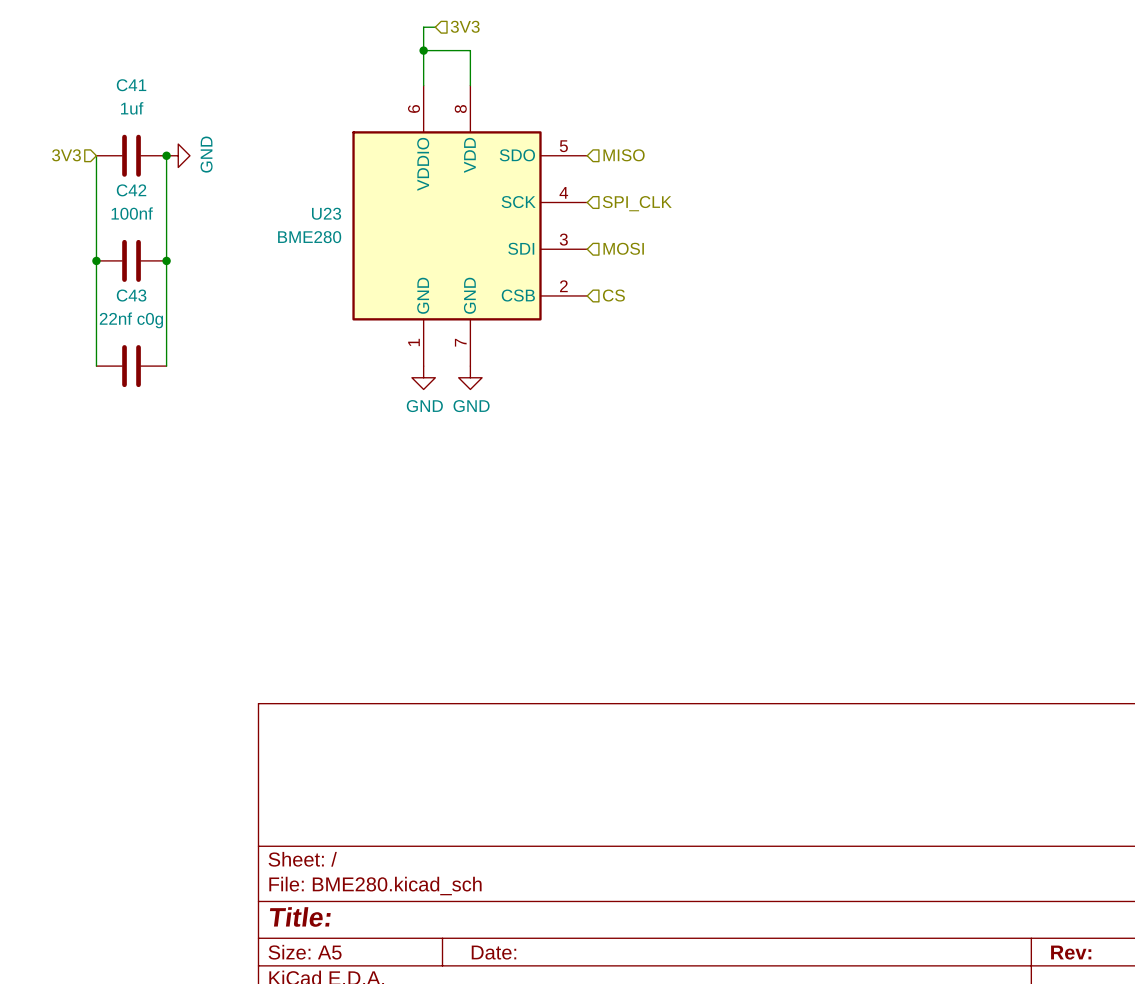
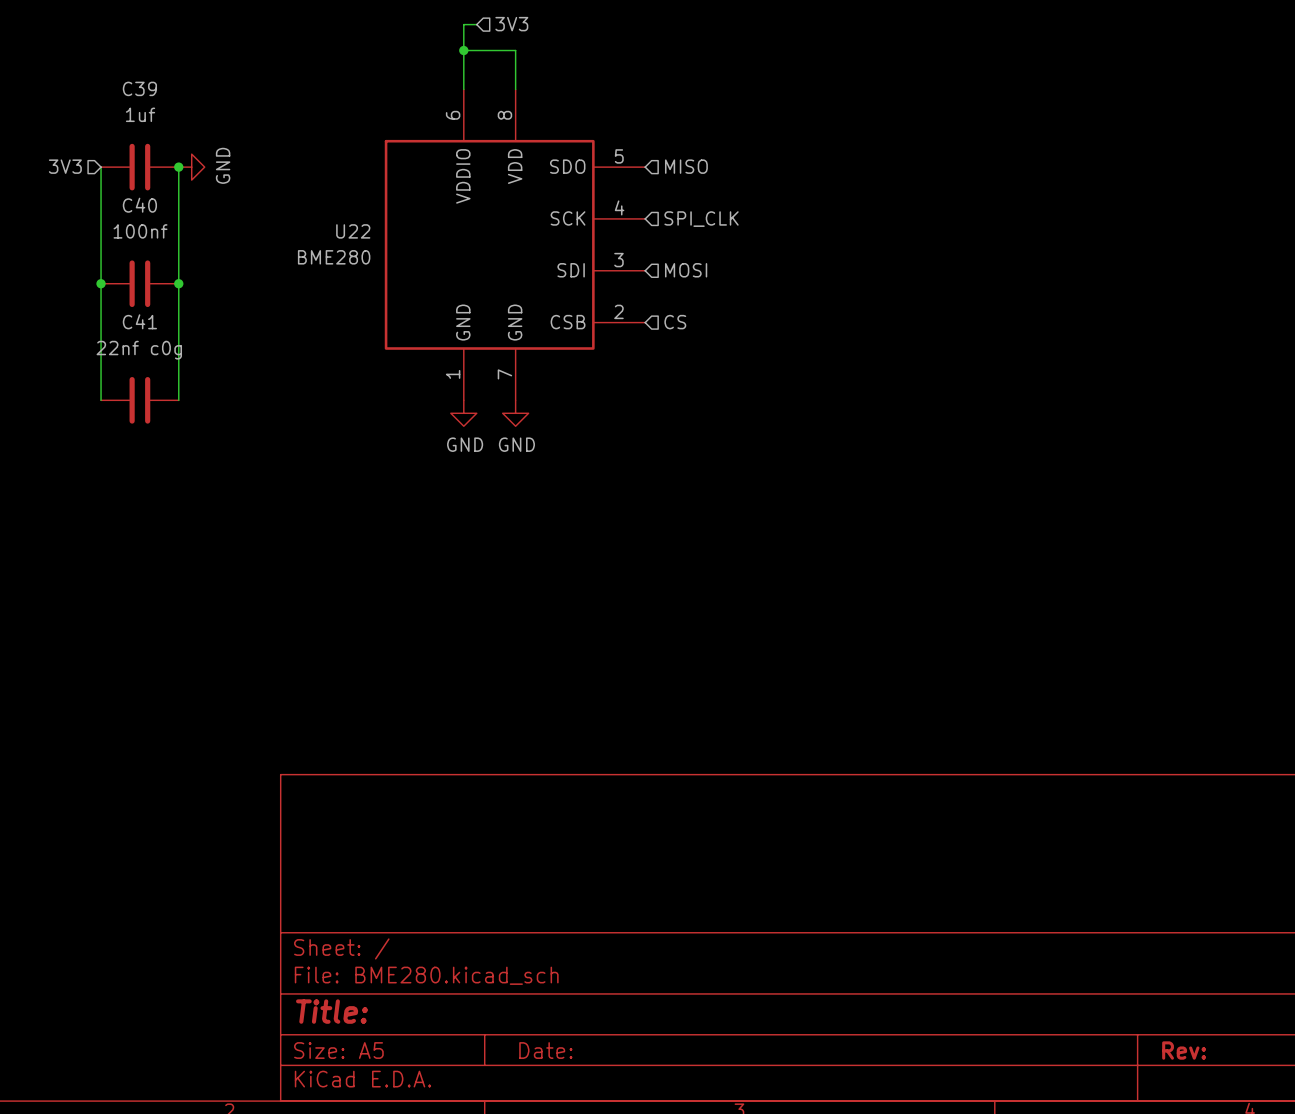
C41 name: C41 (131, 85) -> C39 (139, 88)
C42 name: C42 (131, 190) -> C40 (139, 205)
U23 name: U23 (326, 213) -> U22 (353, 231)
C43 name: C43 (131, 295) -> C41 (139, 321)

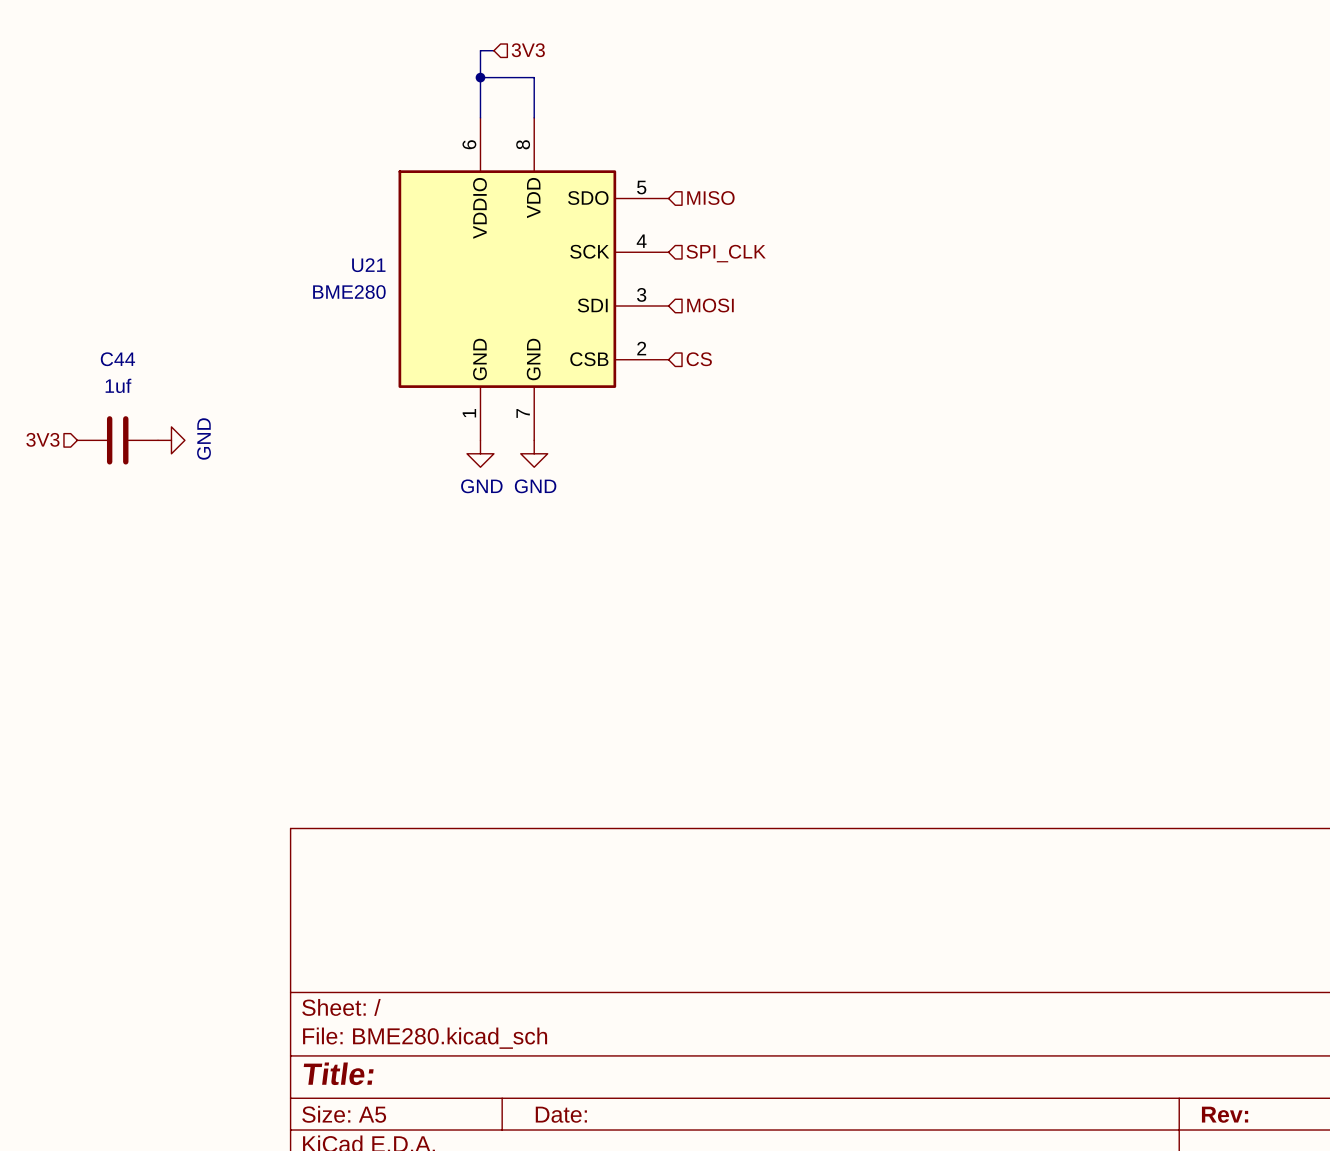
hierarchical label position: 3V3 (65, 166) -> 3V3 (42, 439)
wire: (101, 167) (101, 400) -> none
C39: 1uf (139, 167) -> none
wire: (178, 167) (178, 400) -> none
junction: (178, 167) -> none
power symbol position: GND (191, 167) -> GND (171, 440)
U22 name: U22 (353, 231) -> U21 (368, 265)
junction: (101, 283) -> none
C40: 100nf (139, 283) -> none
junction: (178, 283) -> none
C44: none -> 1uf (117, 440)
C41: 22nf c0g (139, 400) -> none

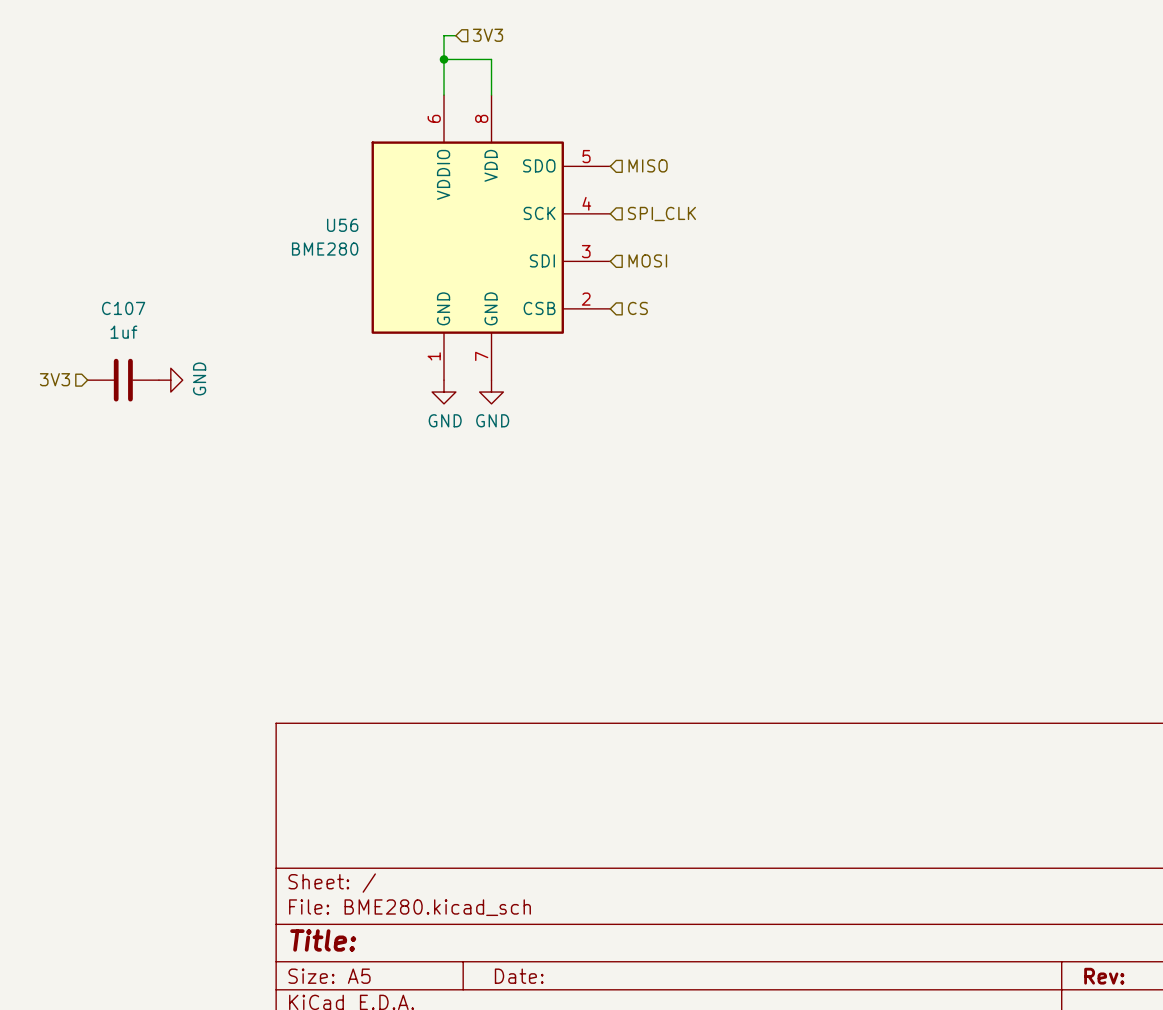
U21 name: U21 (368, 265) -> U56 (342, 225)
C44 name: C44 (117, 359) -> C107 (123, 308)

